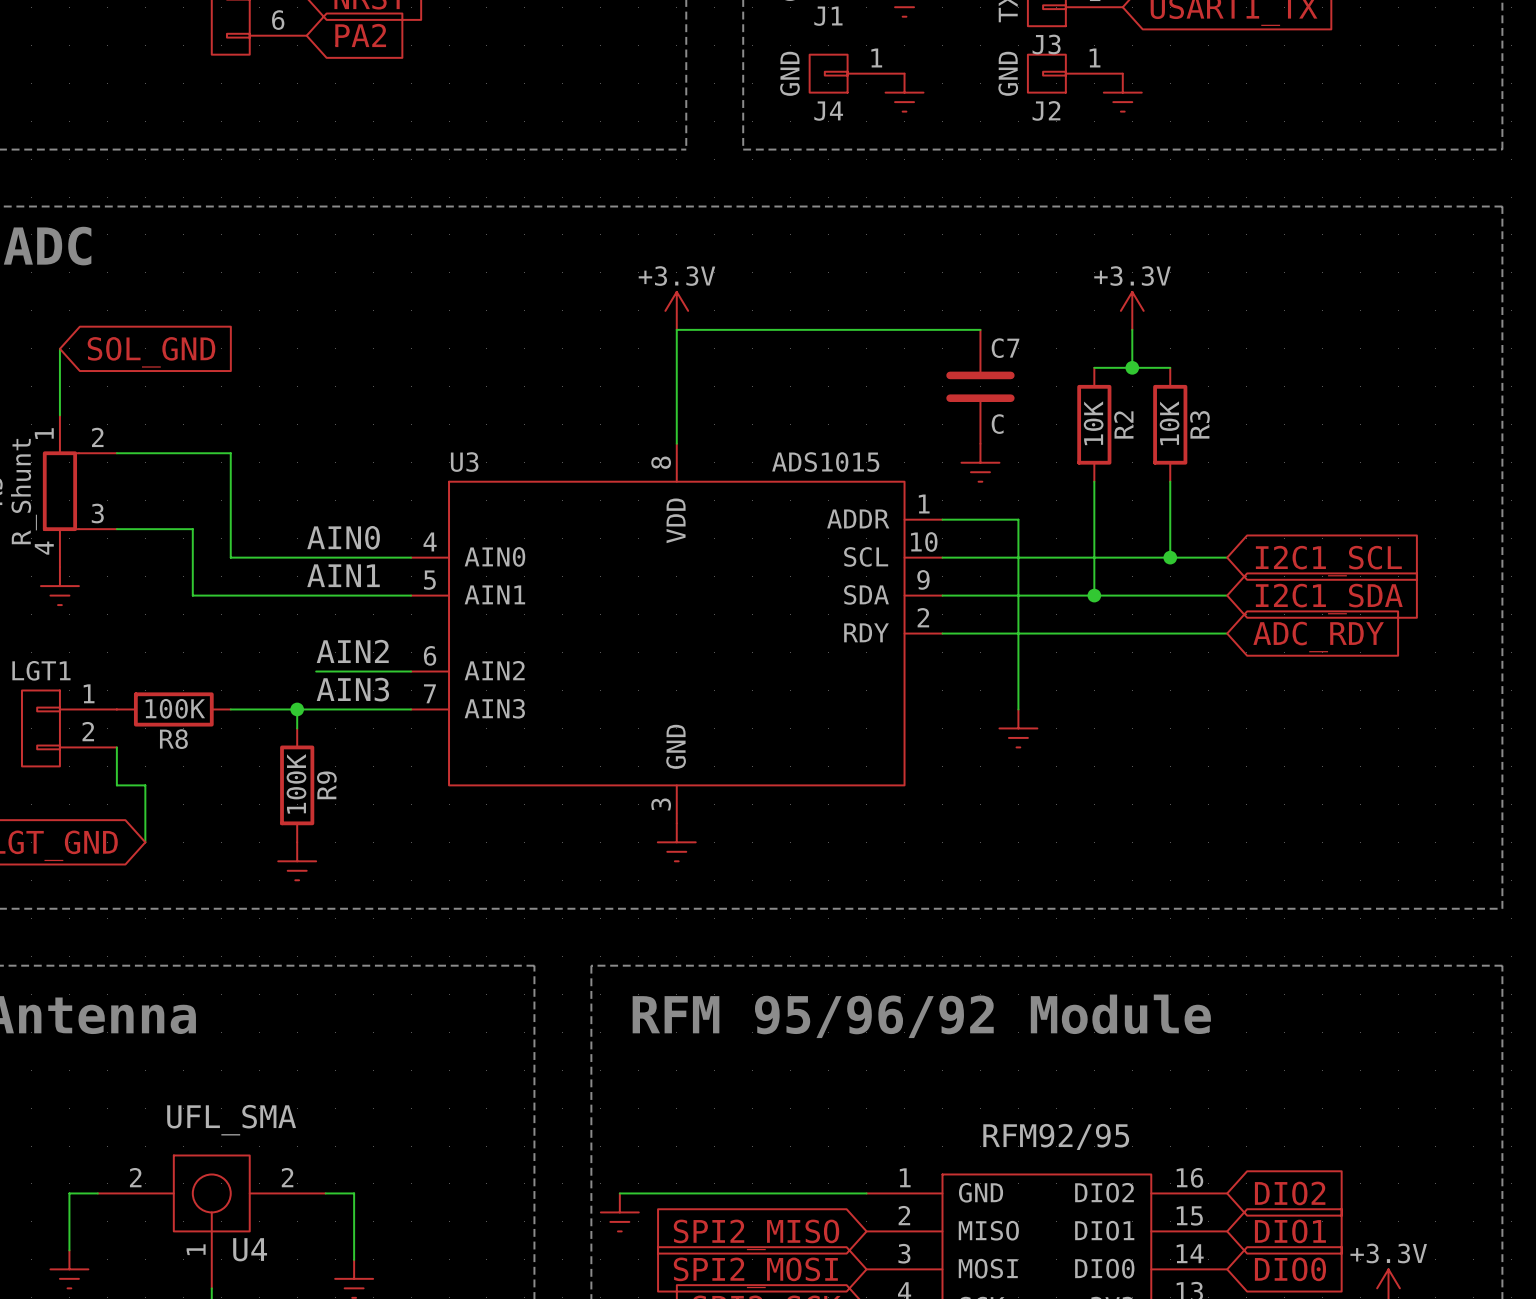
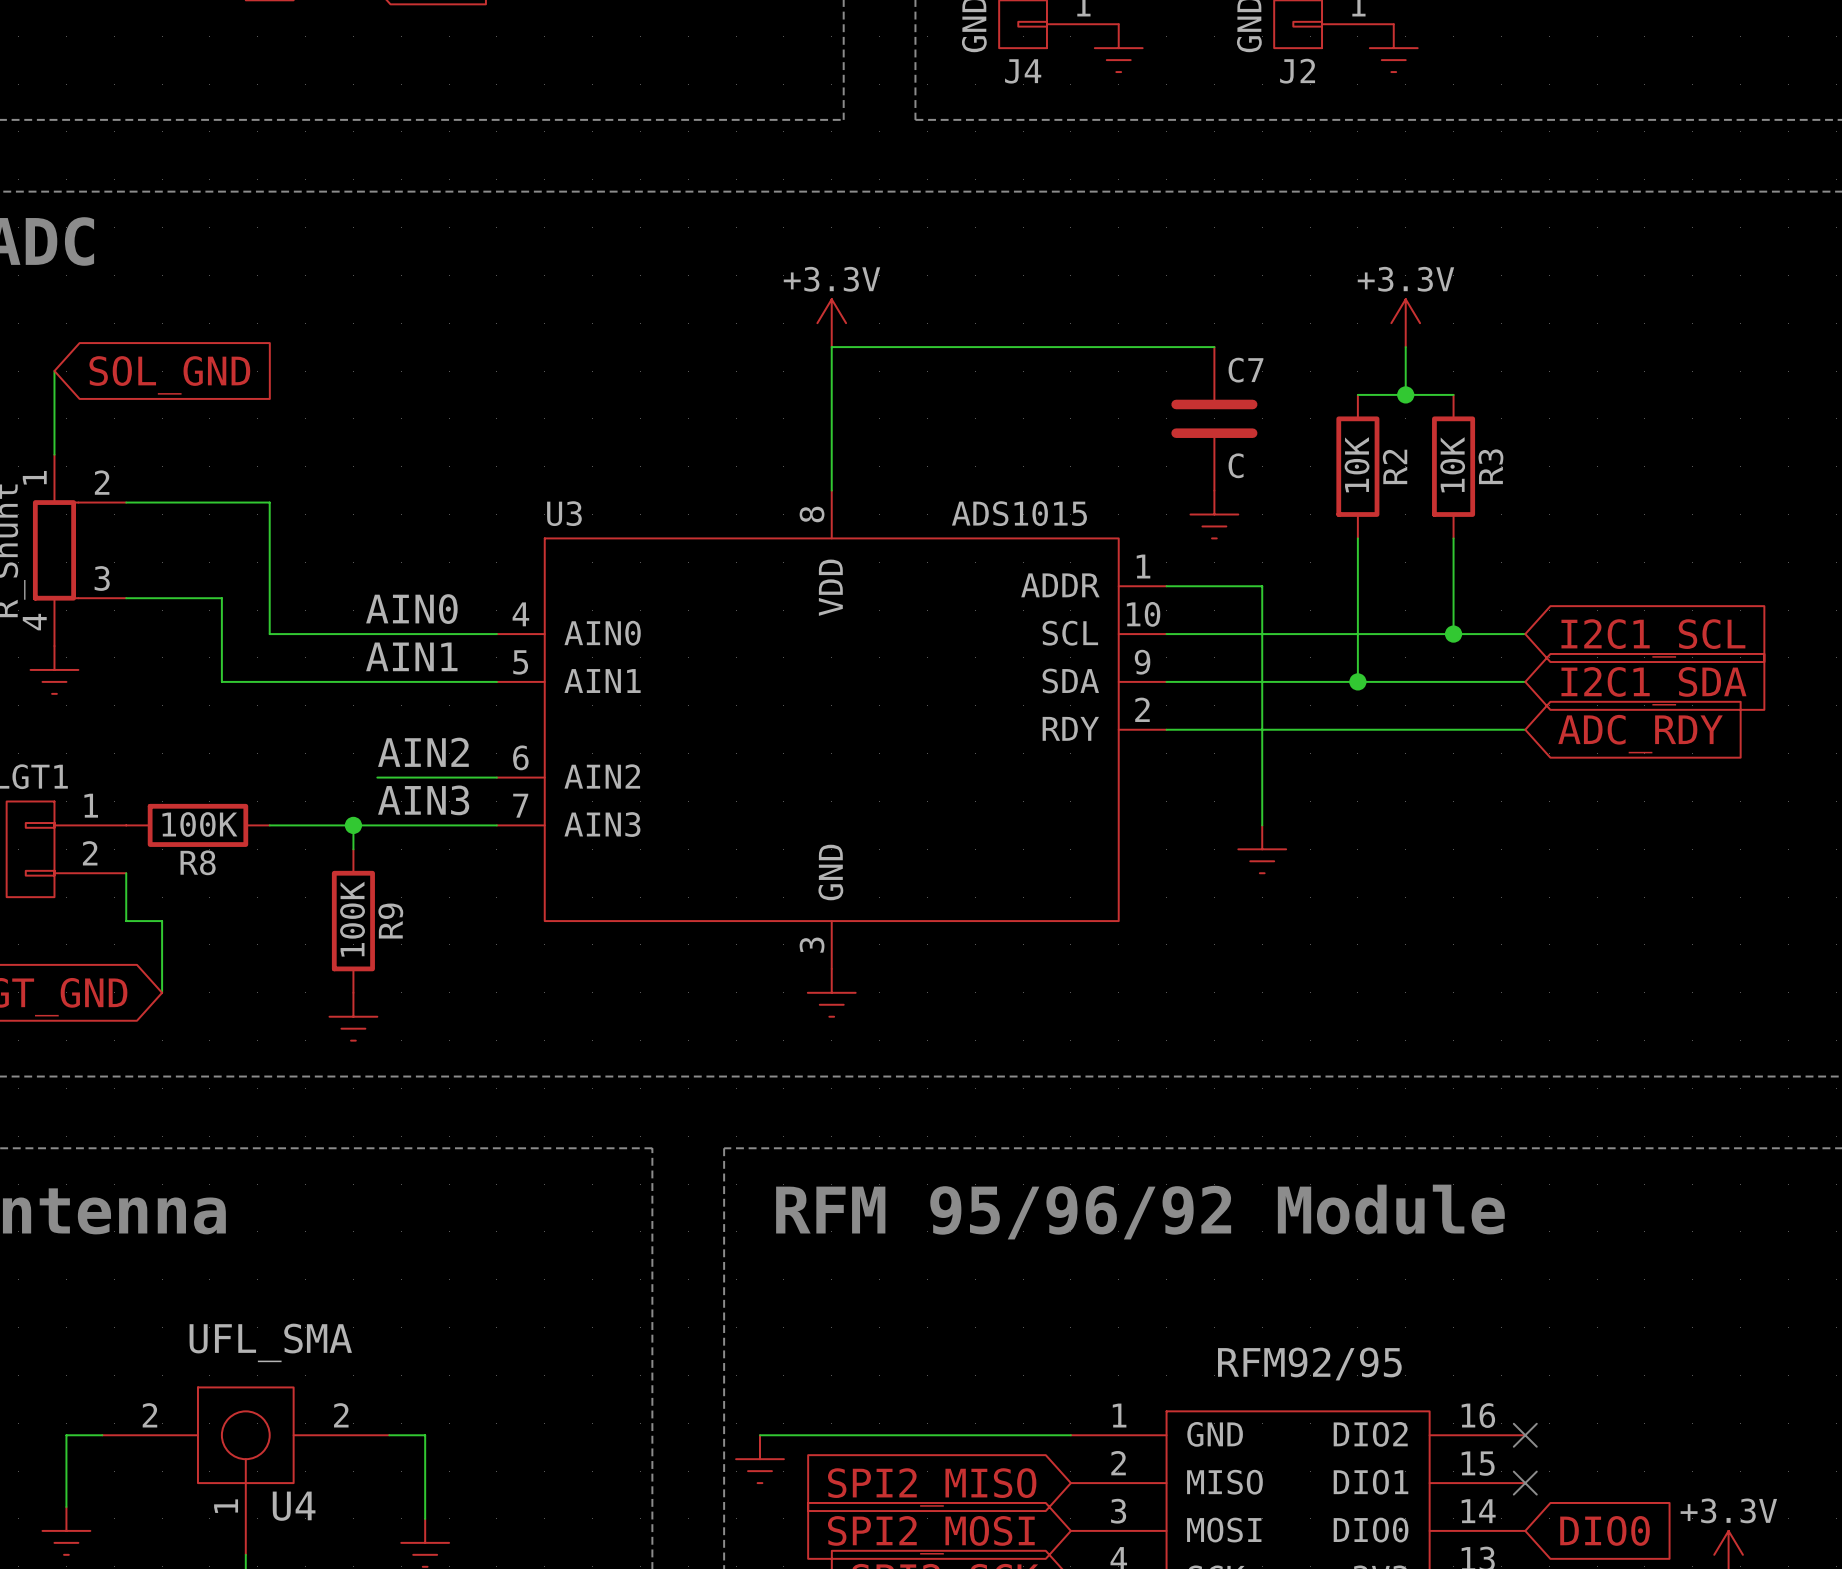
no-connect mark: none -> (1525, 1435)
global label: DIO2 (1290, 1193) -> none
no-connect mark: none -> (1525, 1483)
global label: DIO1 (1290, 1231) -> none

